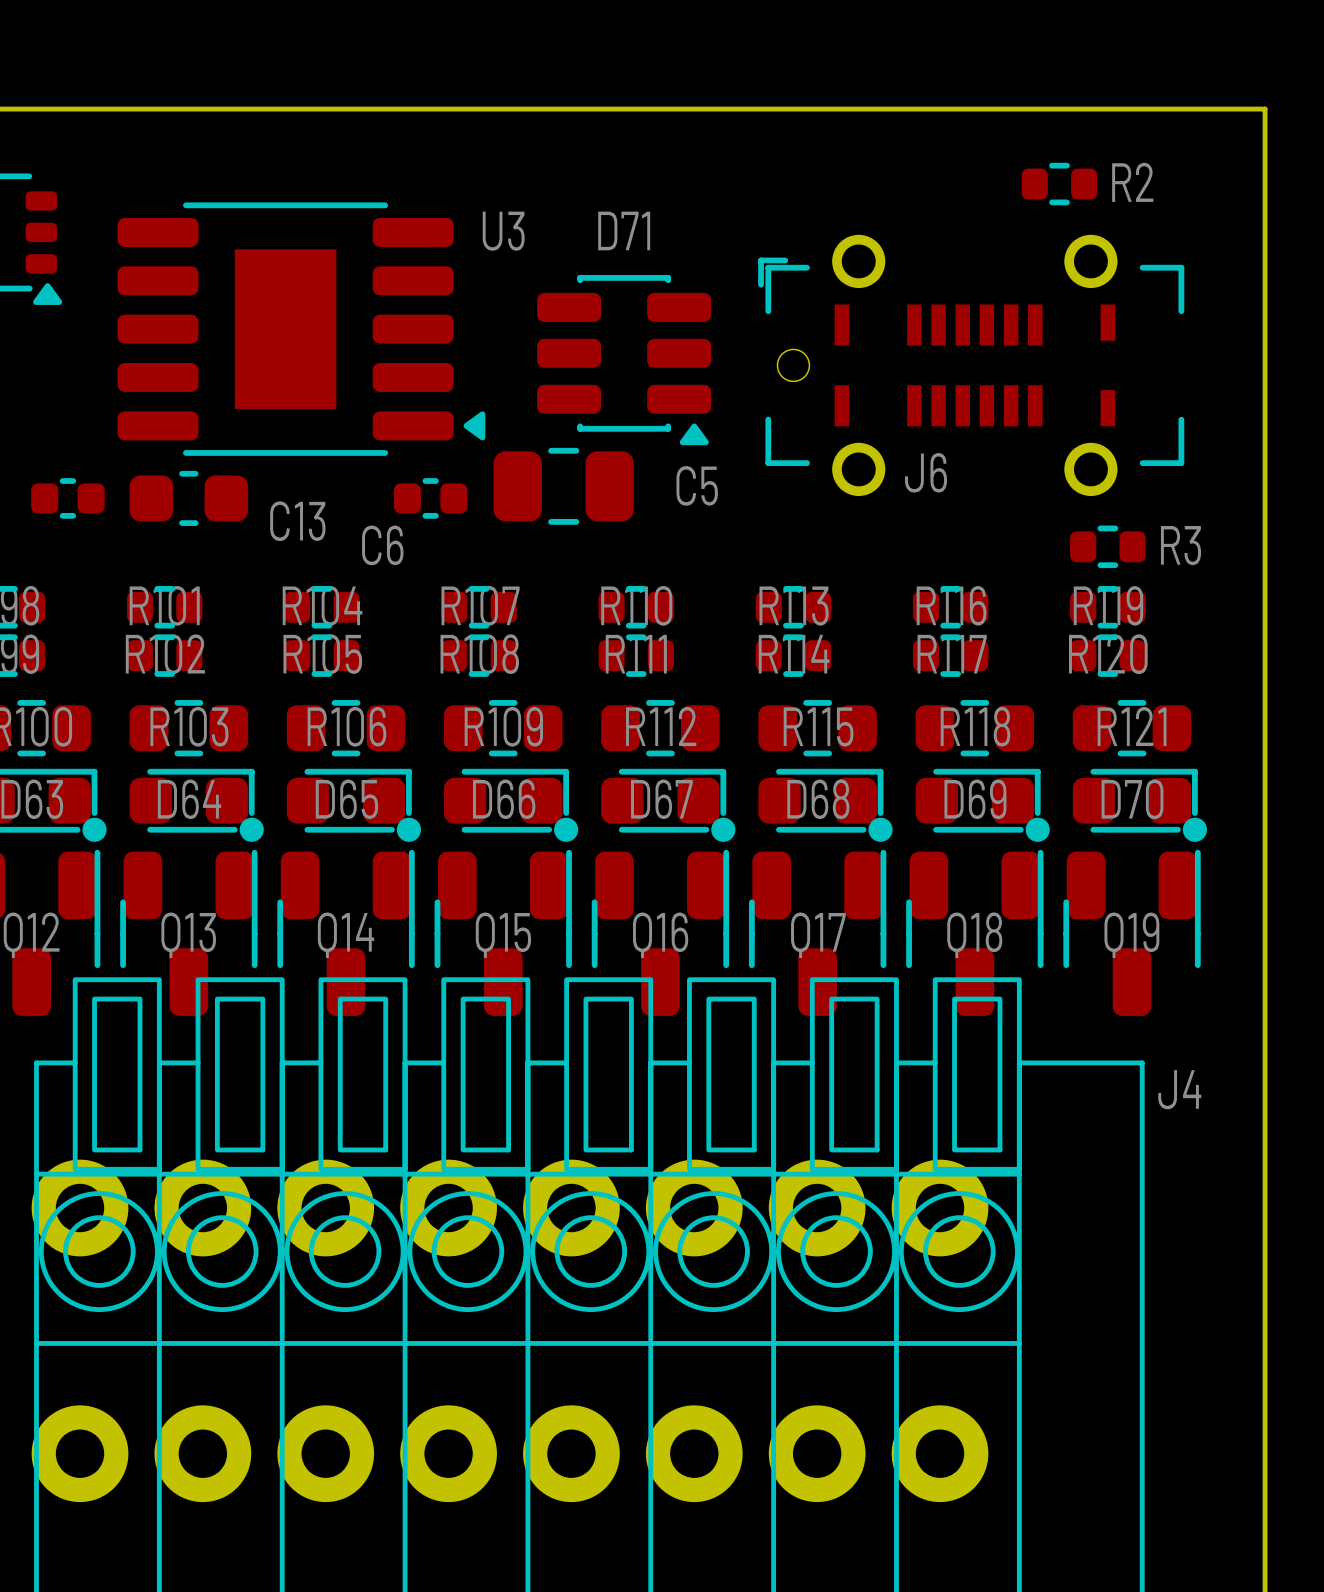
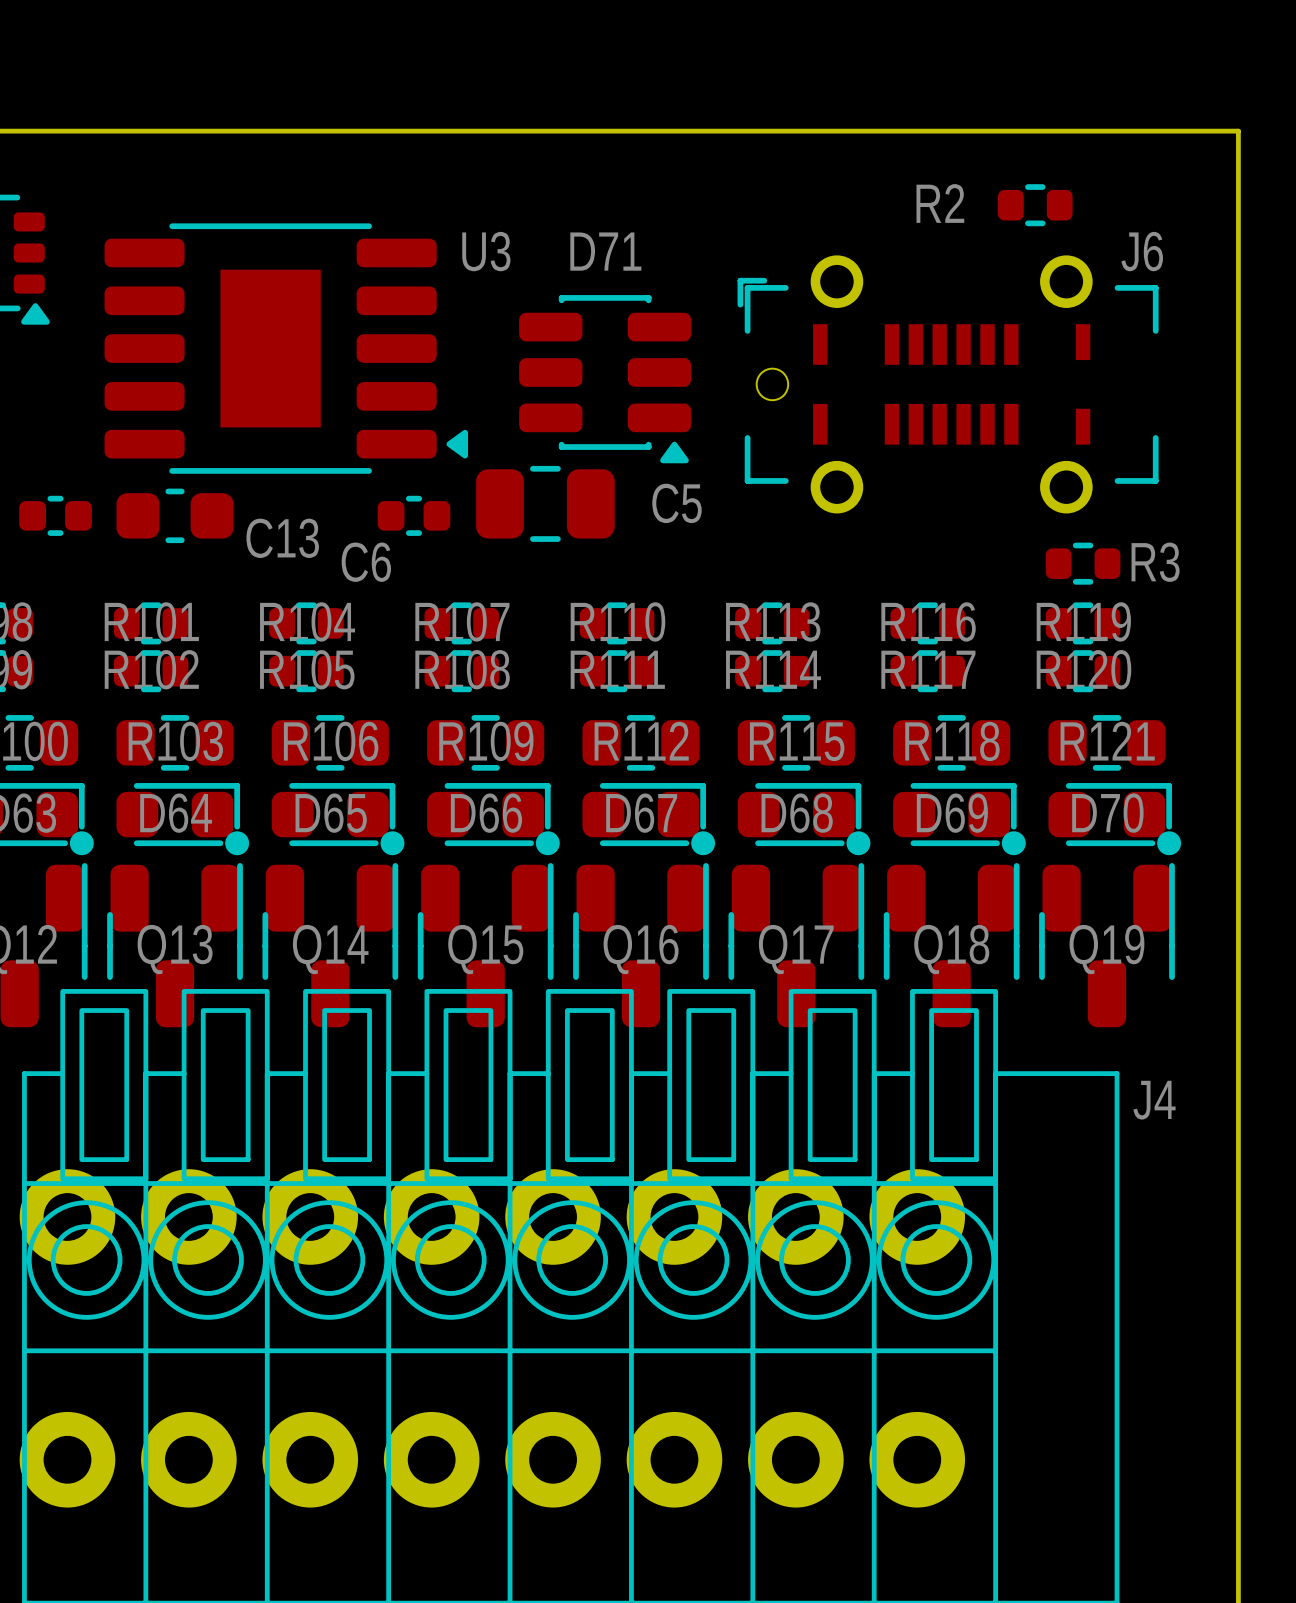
R2 name position: R2 (1132, 182) -> R2 (940, 203)
J6 name position: J6 (926, 472) -> J6 (1142, 251)

